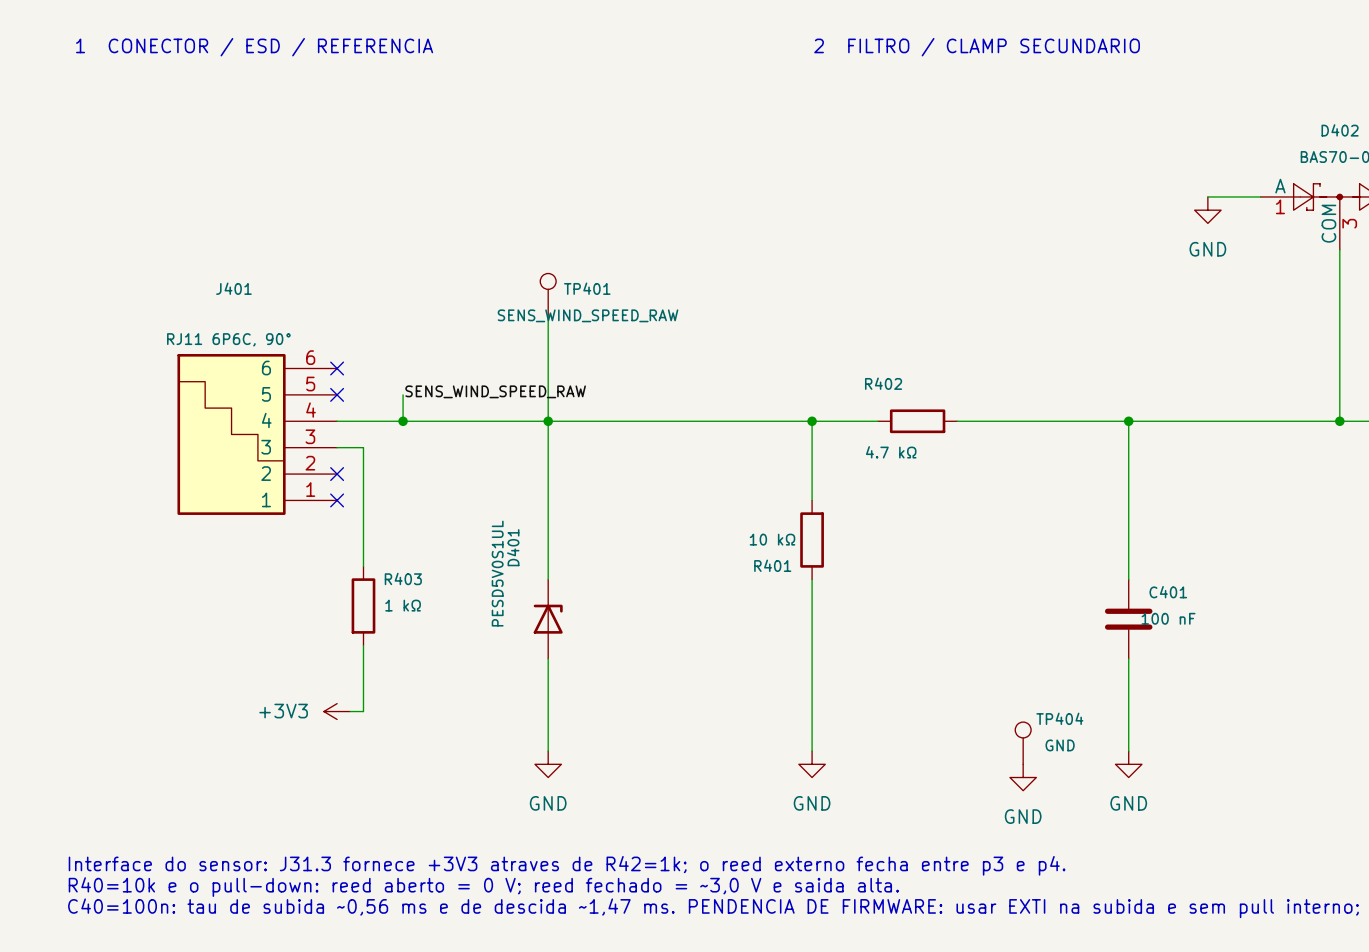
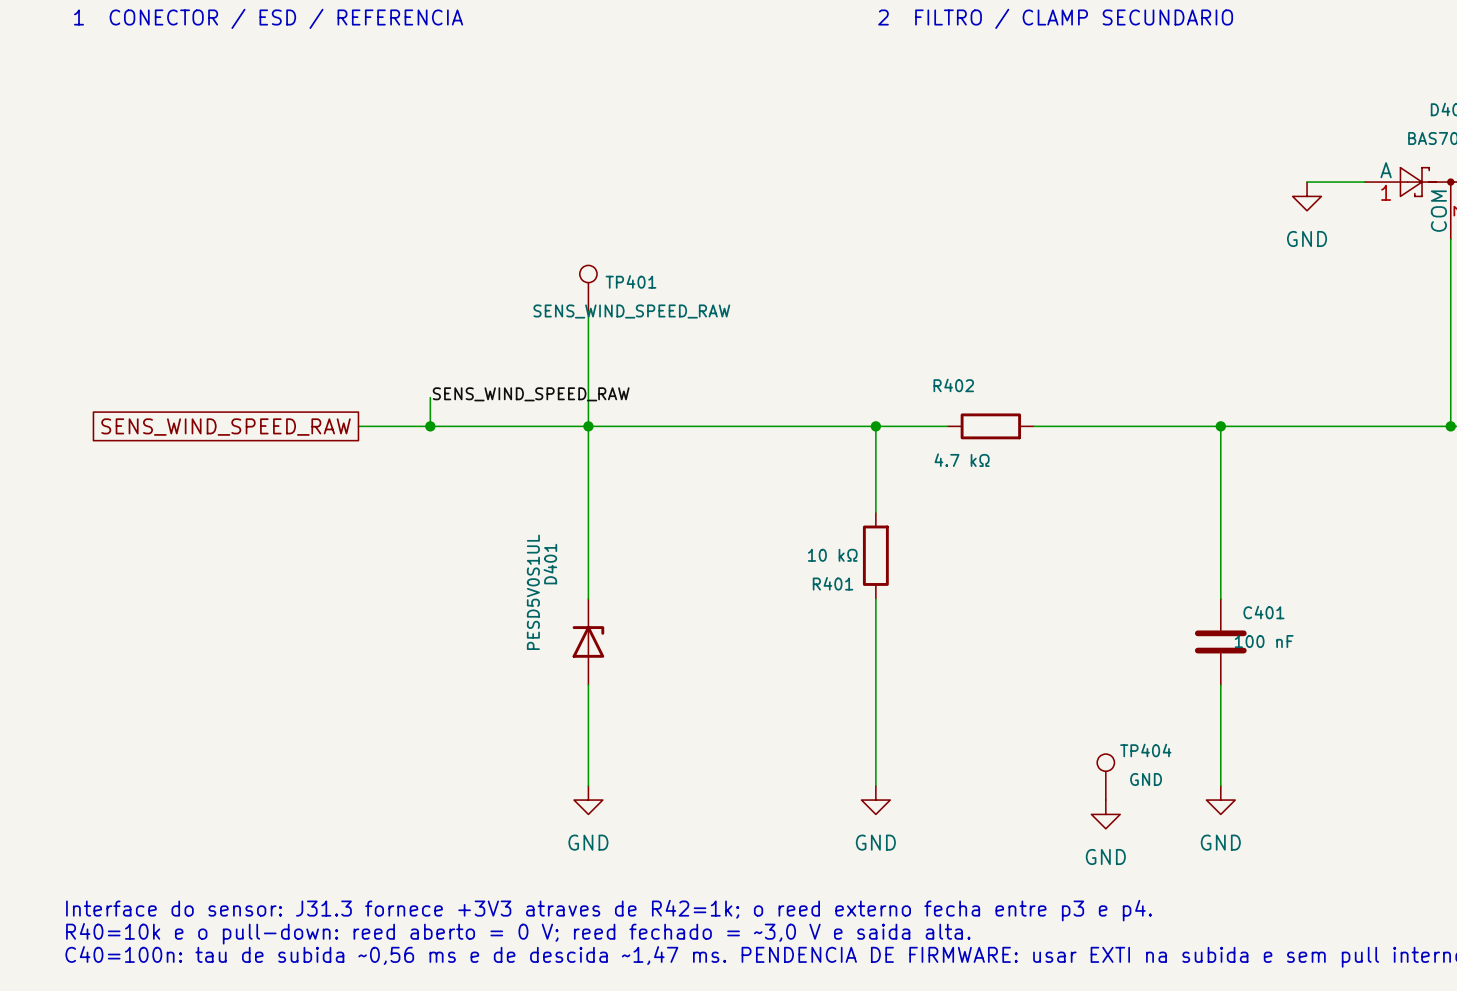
no-connect mark: (337, 368) -> none
no-connect mark: (337, 394) -> none
global label: none -> SENS_WIND_SPEED_RAW (226, 427)
J401: RJ11 6P6C, 90° (257, 434) -> none
wire: (337, 447) (363, 447) (363, 566) -> none
no-connect mark: (337, 474) -> none
no-connect mark: (337, 500) -> none
R403: 1 kΩ (363, 605) -> none
wire: (363, 645) (363, 711) (350, 711) -> none
power symbol: +3V3 (337, 711) -> none

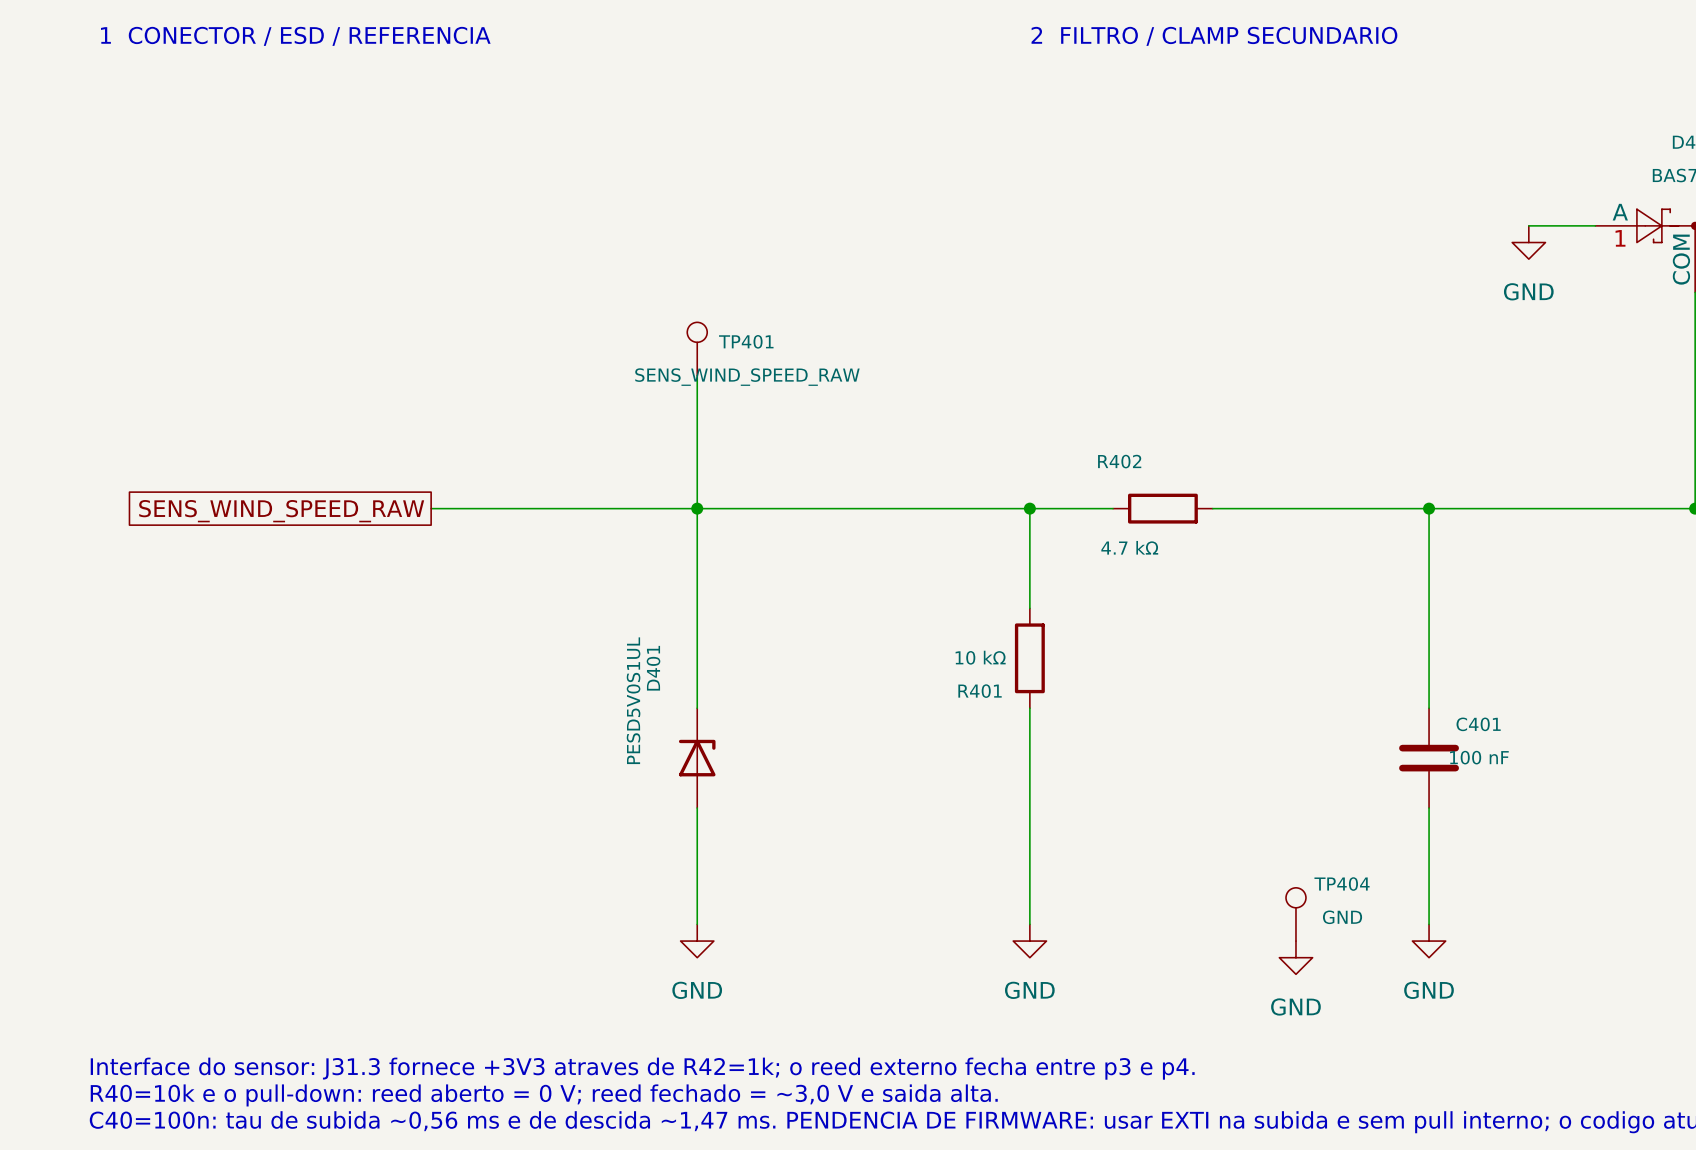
label: SENS_WIND_SPEED_RAW (531, 394) -> none
wire: (430, 397) (430, 426) -> none
junction: (430, 426) -> none

